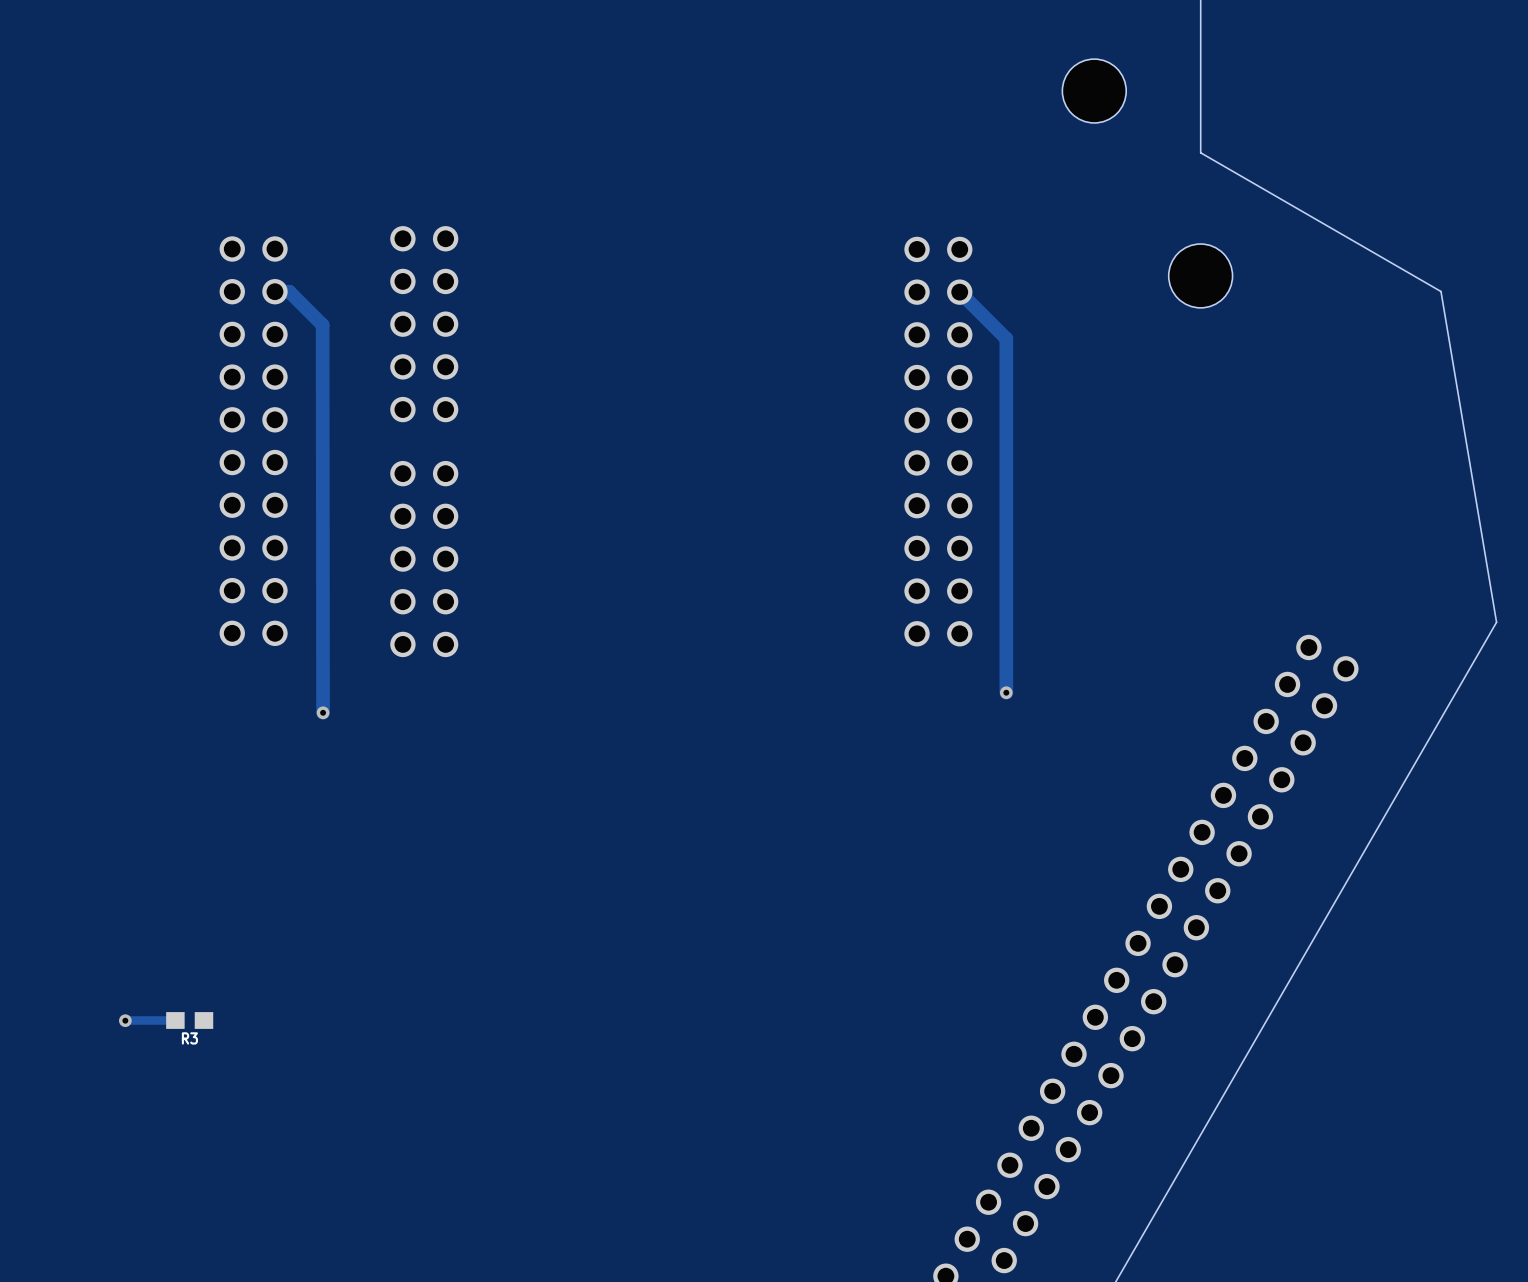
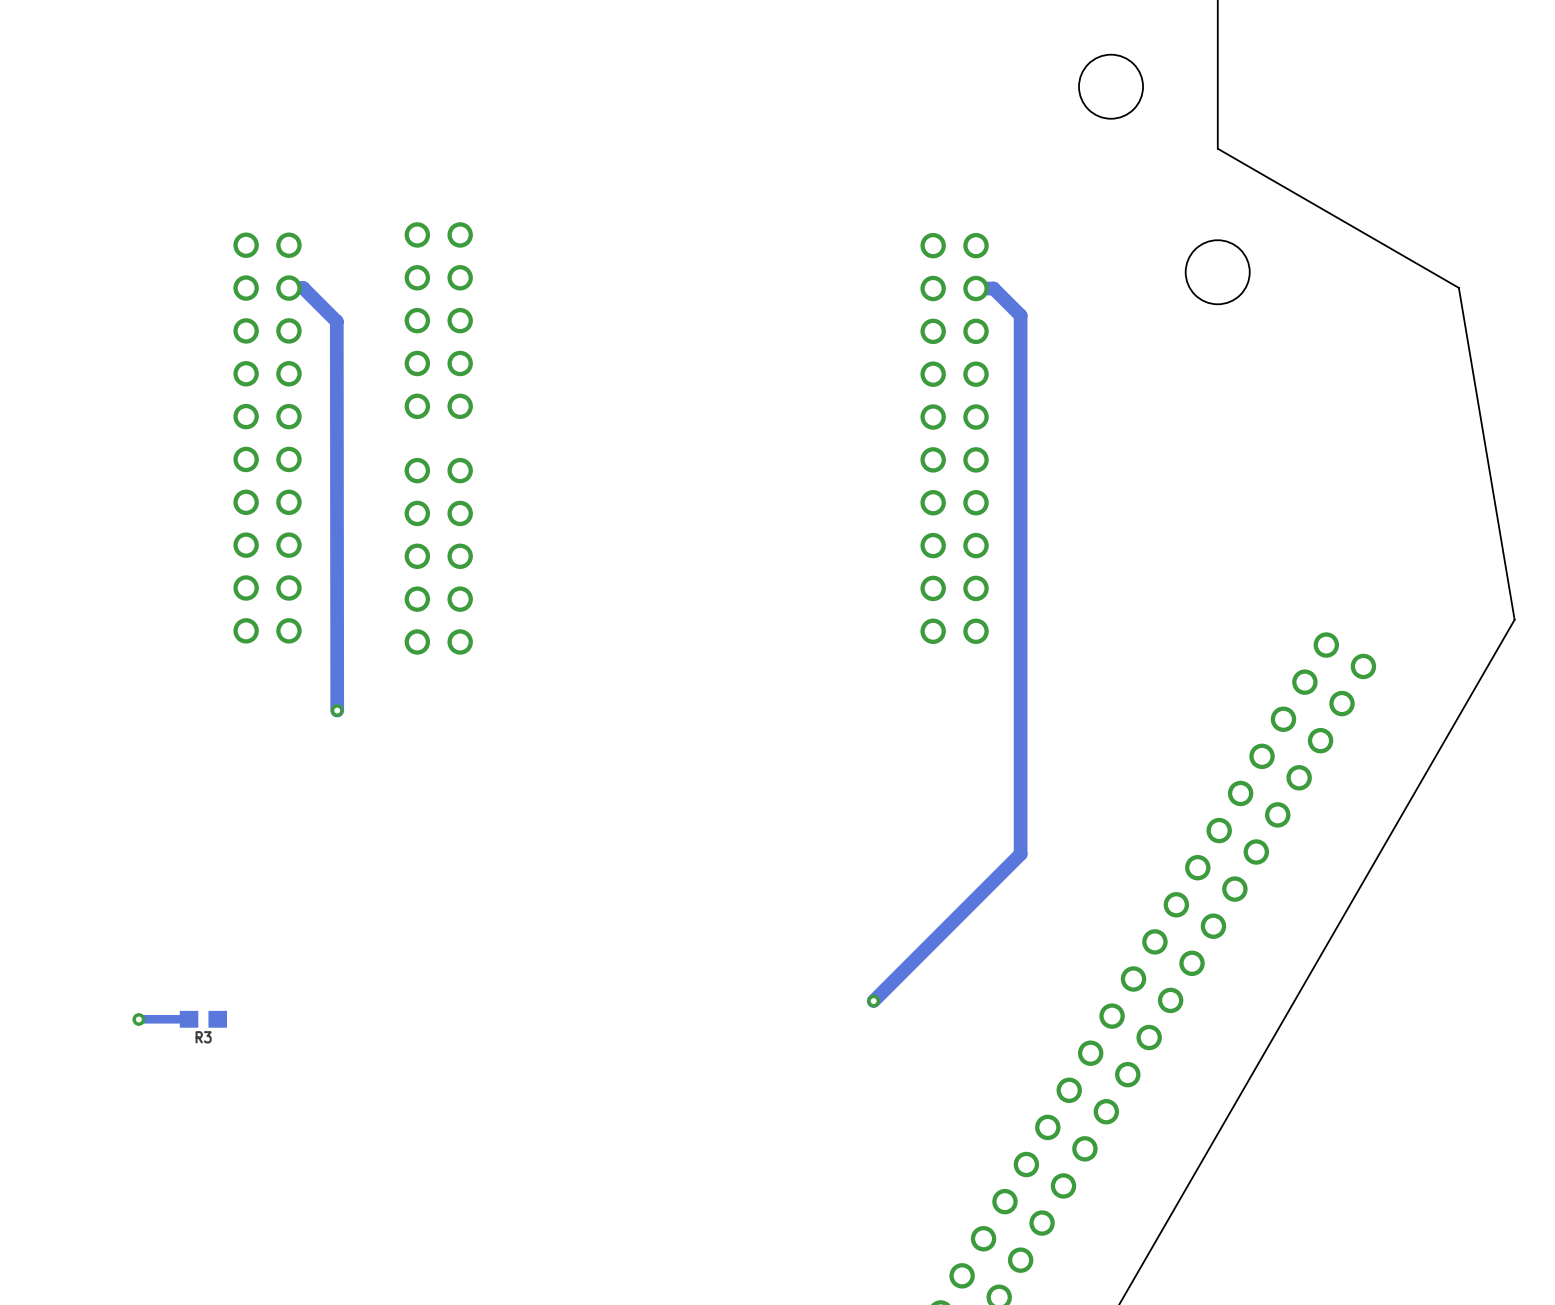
track: (959, 292) (1006, 338) (1006, 692) -> (976, 288) (993, 288) (1020, 315) (1020, 854) (873, 1001)
via: (1006, 692) -> none
via: none -> (873, 1001)

